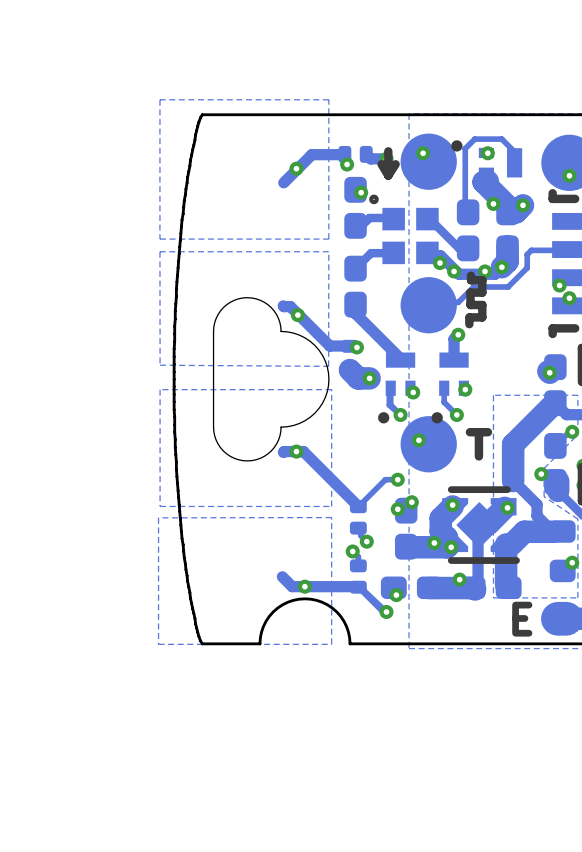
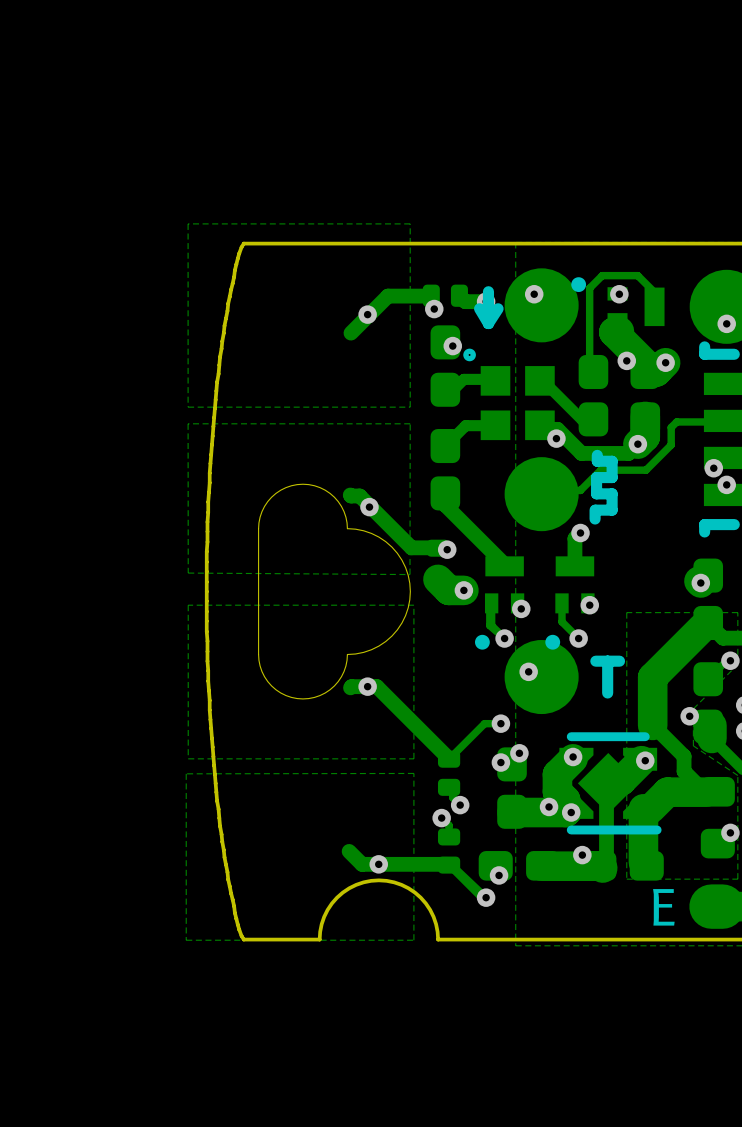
via: (454, 271) -> none
via: (485, 271) -> none

